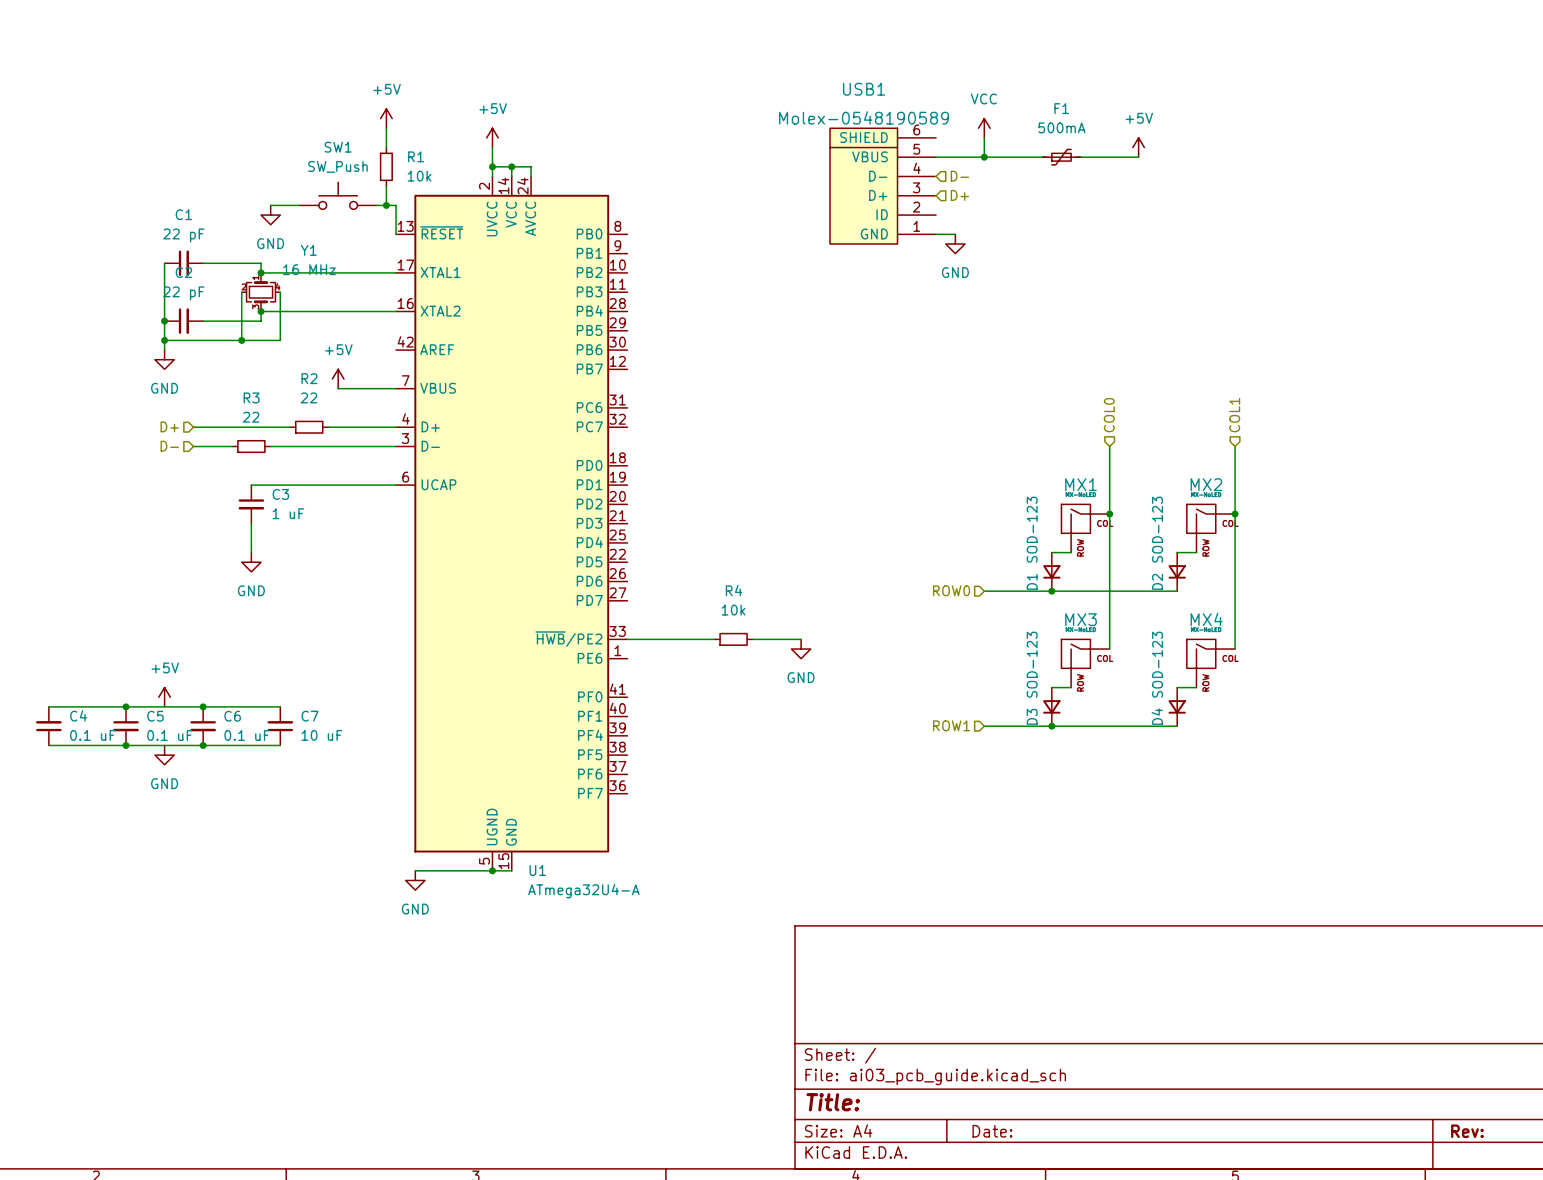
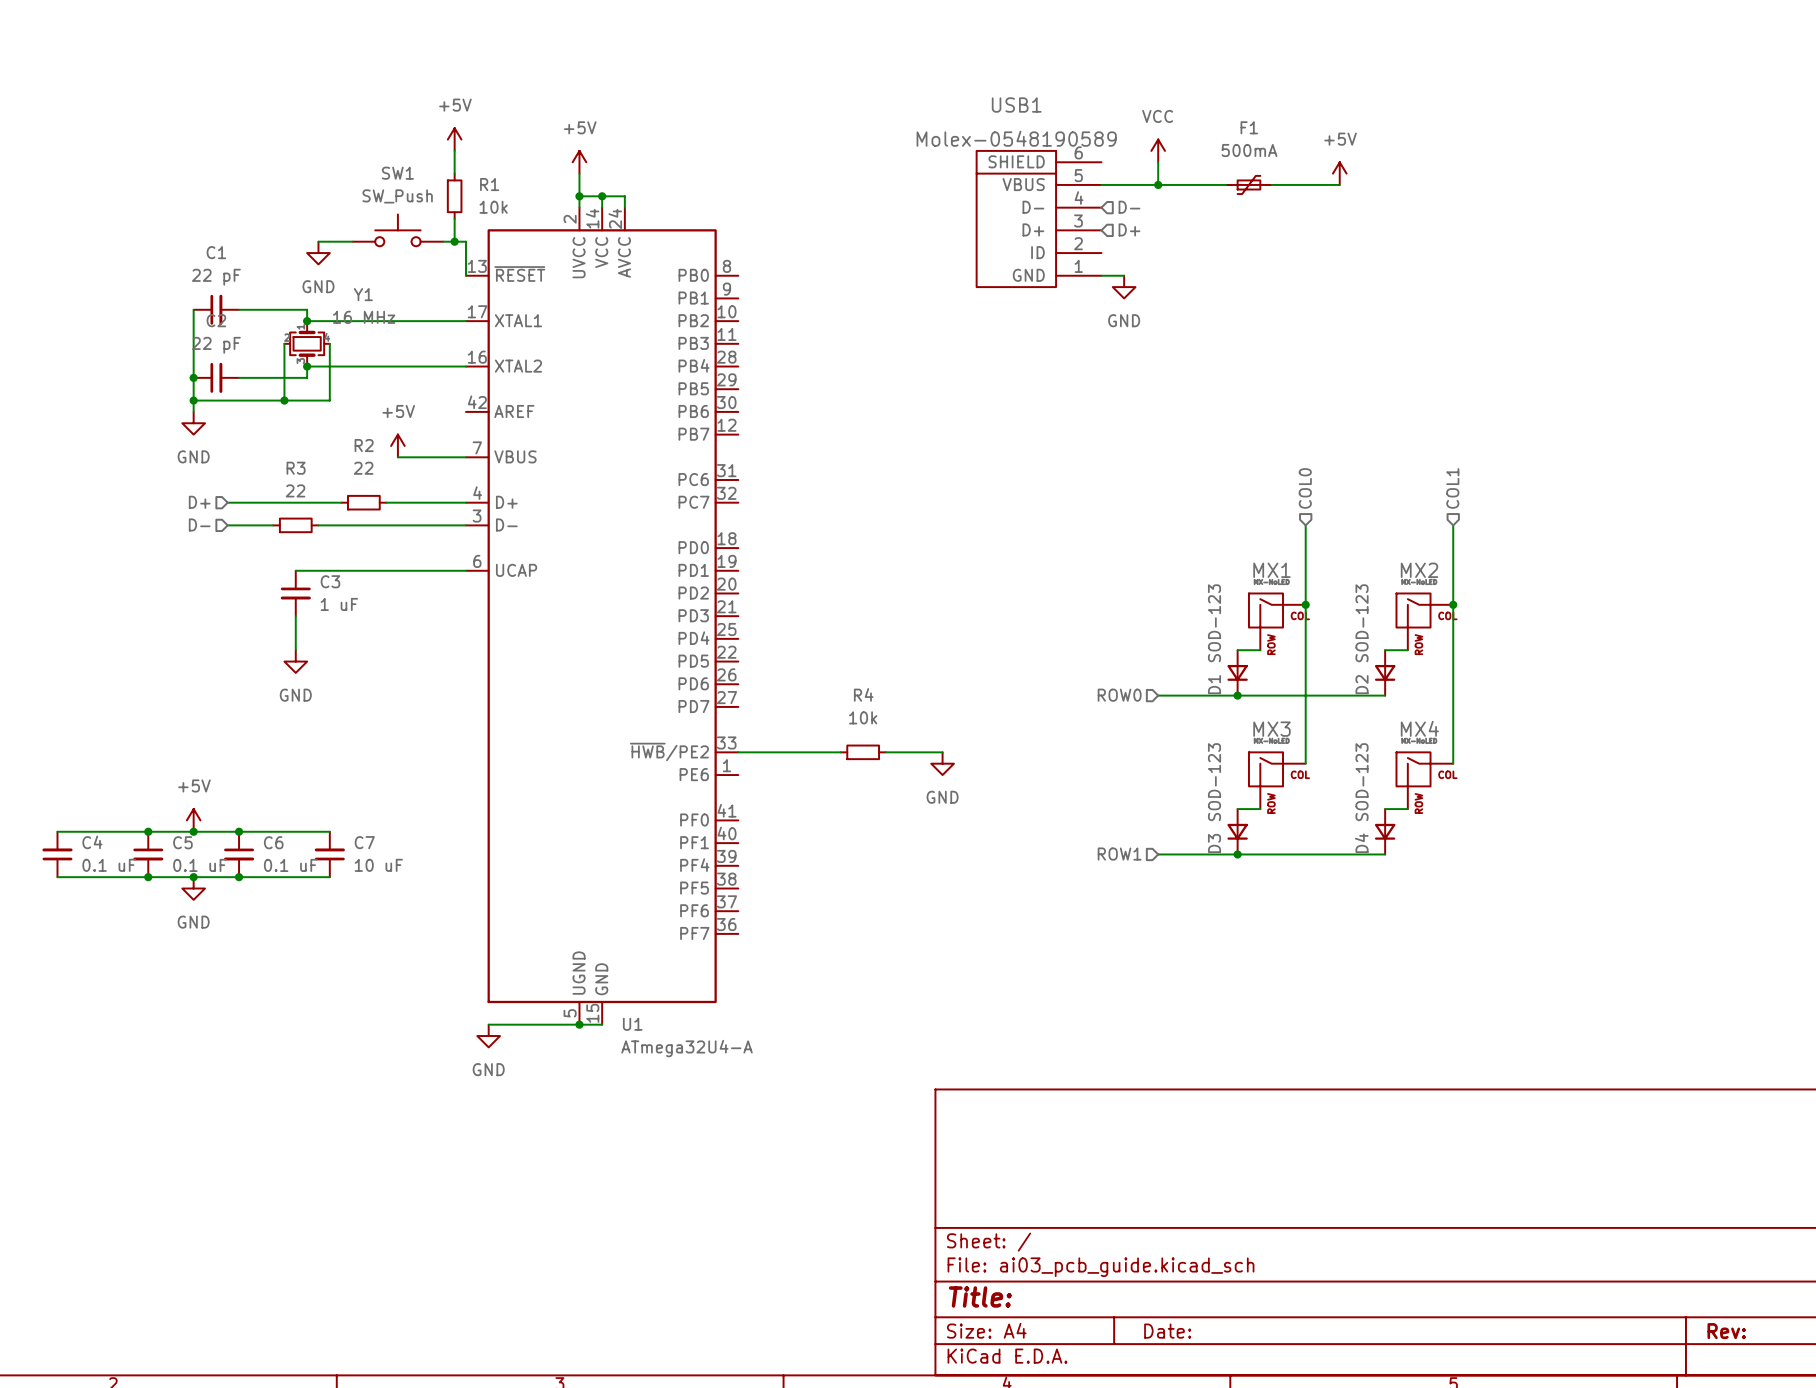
junction: none -> (193, 831)
junction: none -> (193, 877)

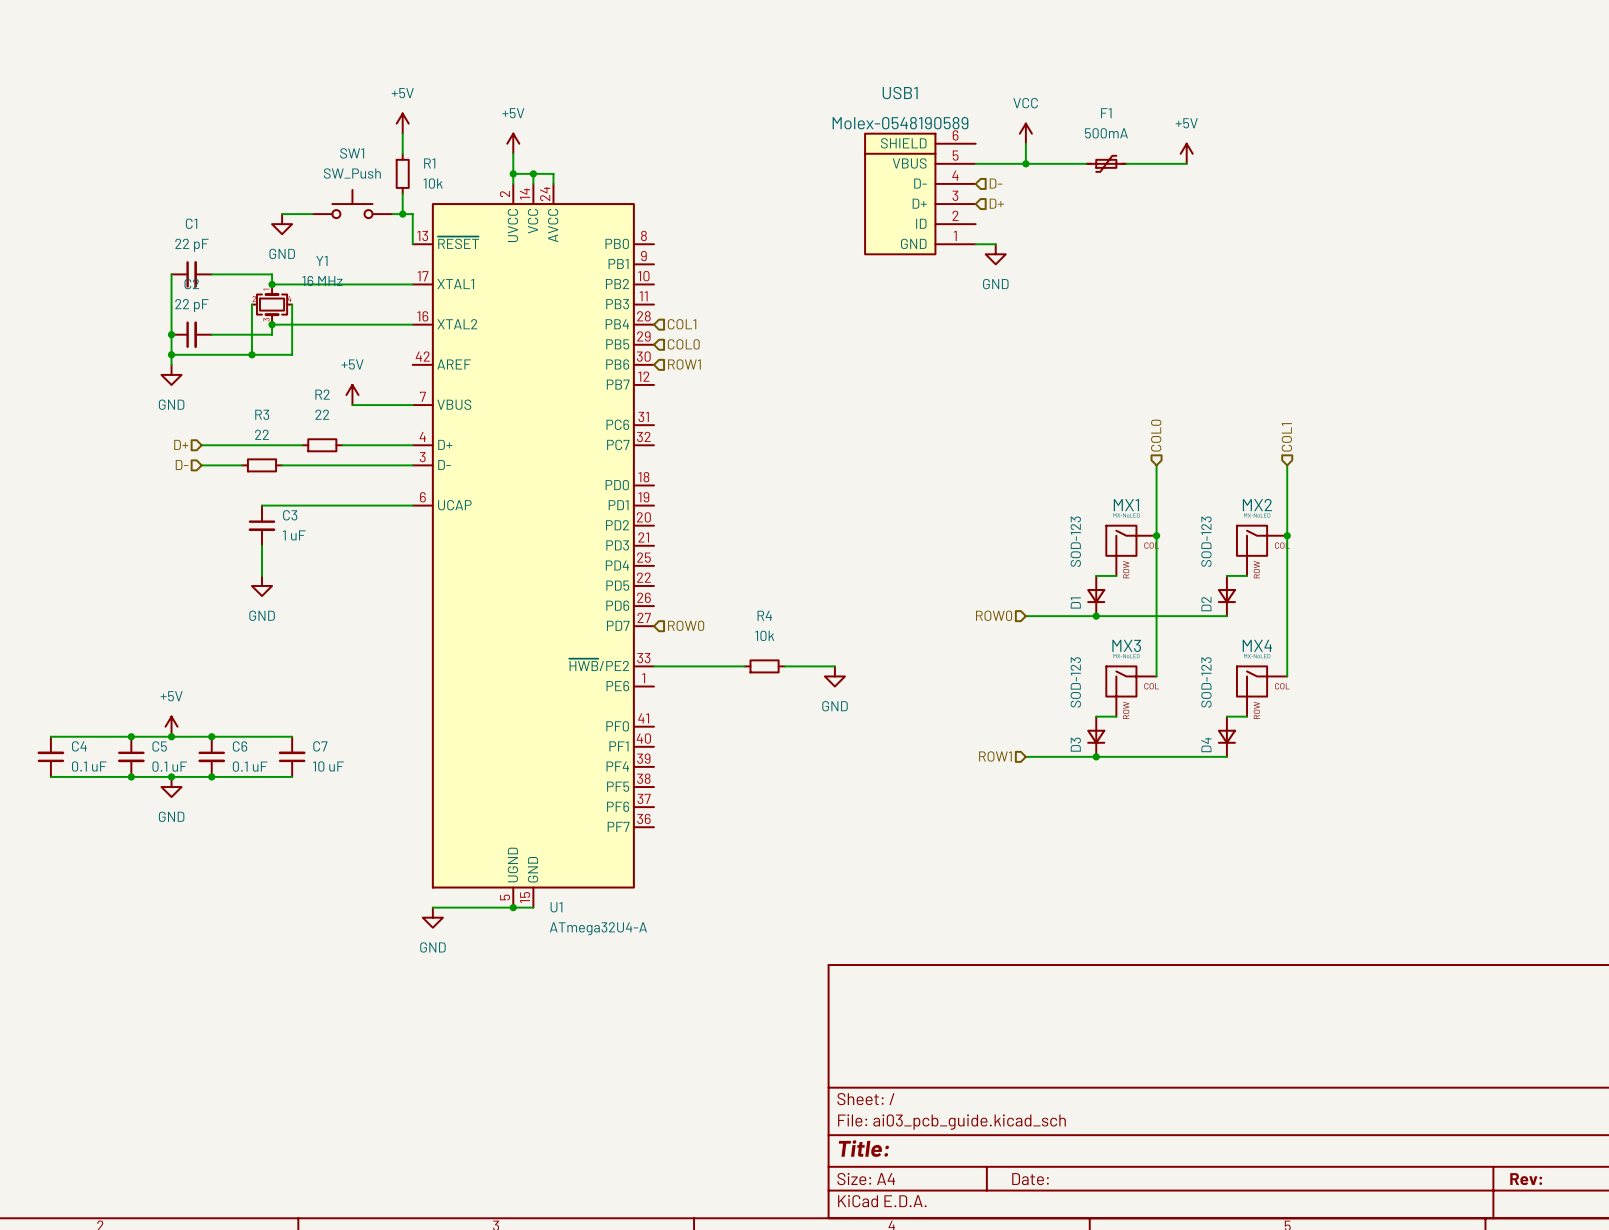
hierarchical label: none -> COL1 (682, 324)
hierarchical label: none -> COL0 (683, 344)
hierarchical label: none -> ROW1 (684, 364)
hierarchical label: none -> ROW0 (686, 625)

